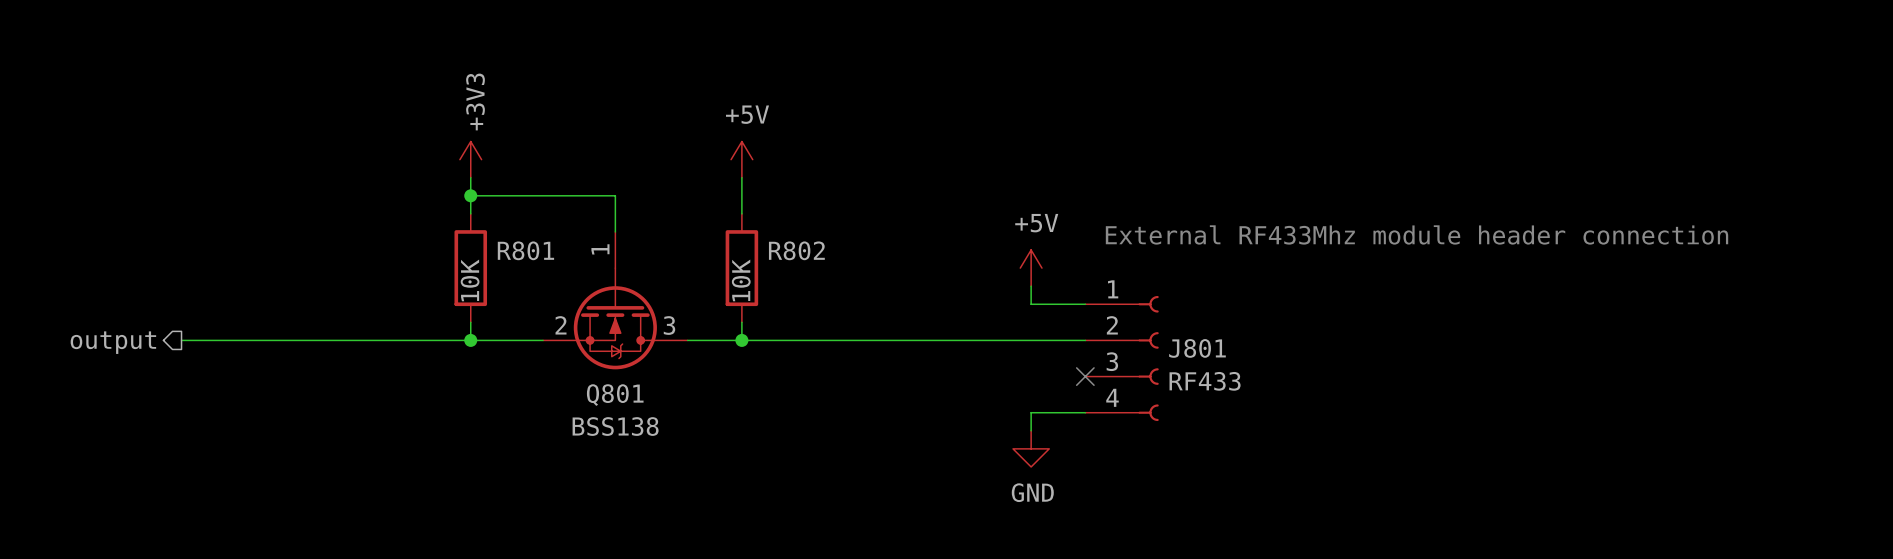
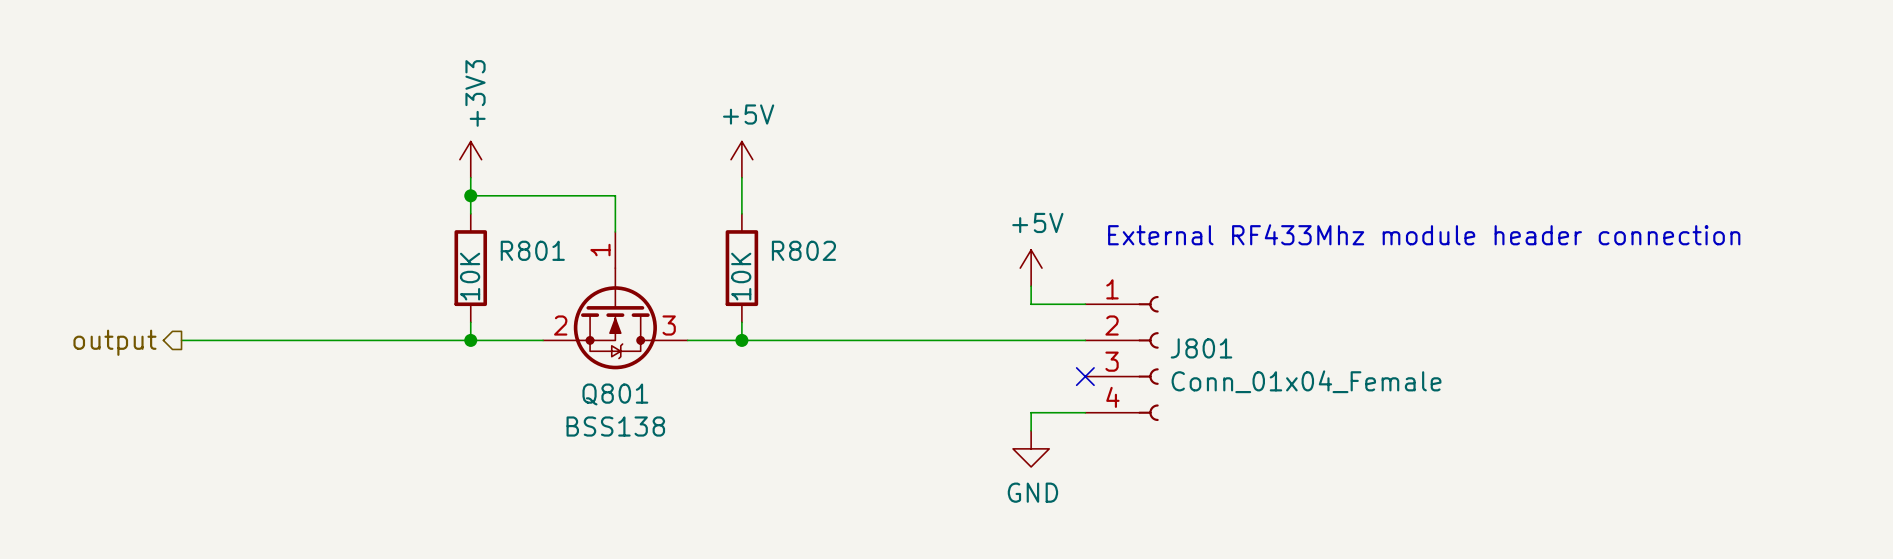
J801 value: RF433 (1205, 381) -> Conn_01x04_Female (1306, 381)

